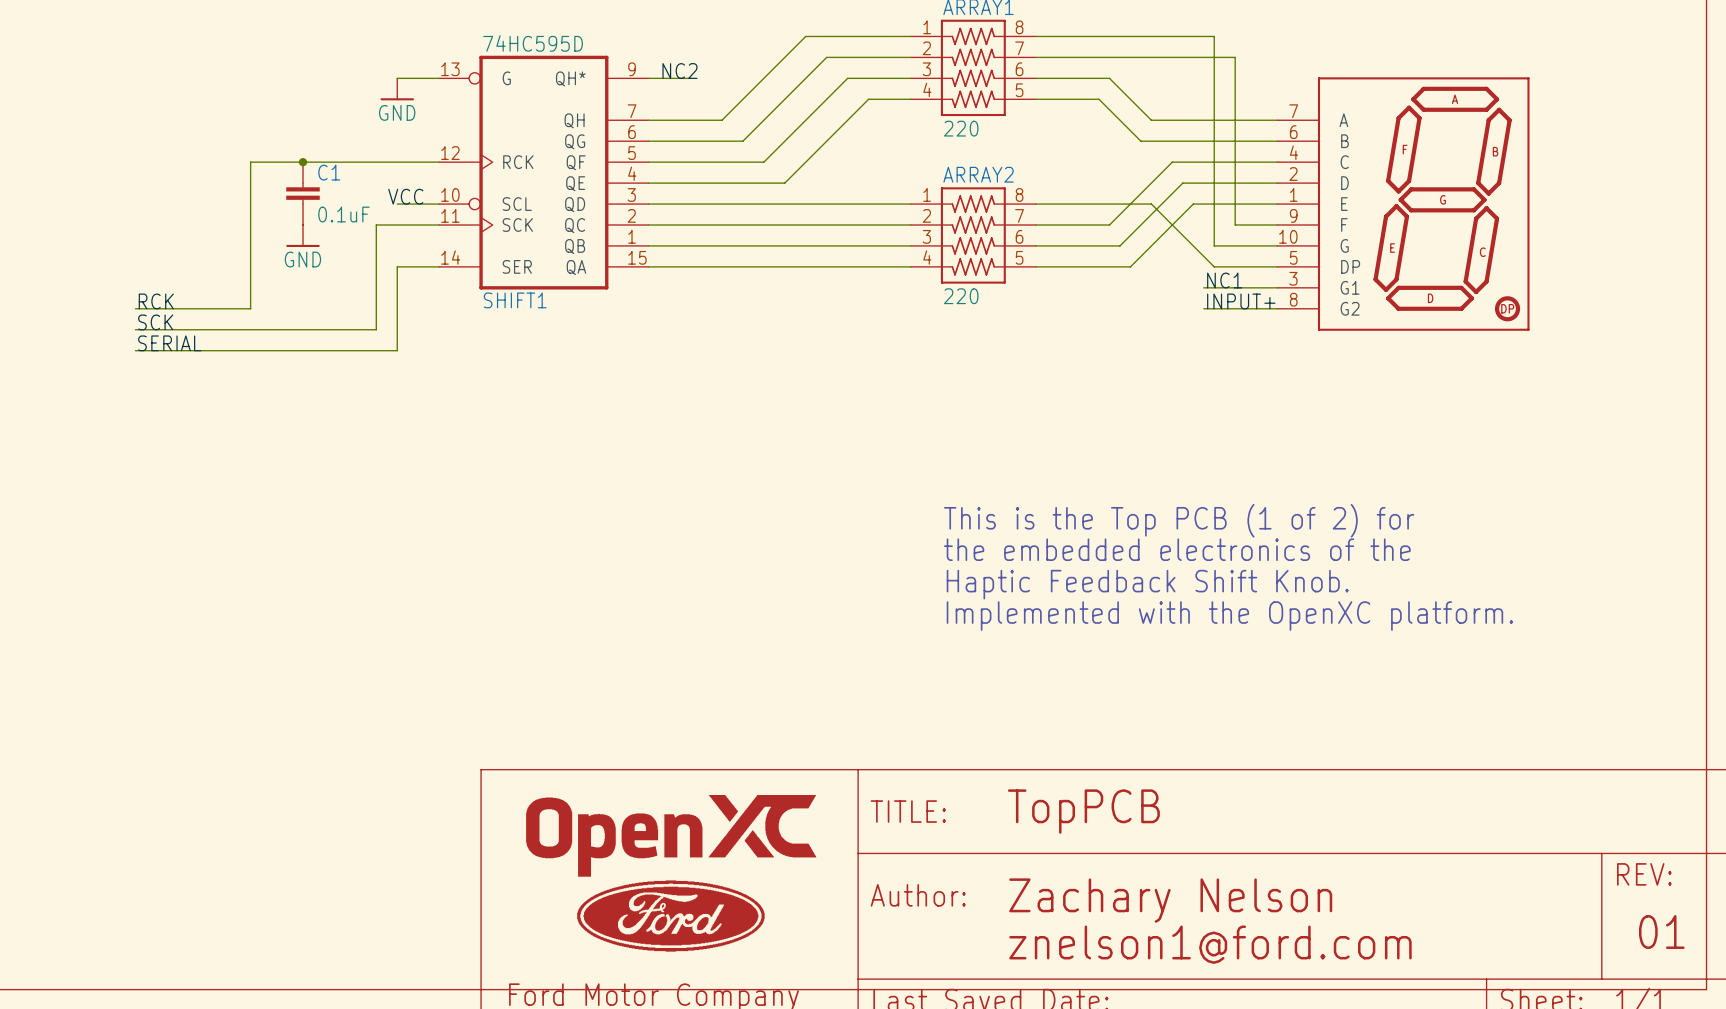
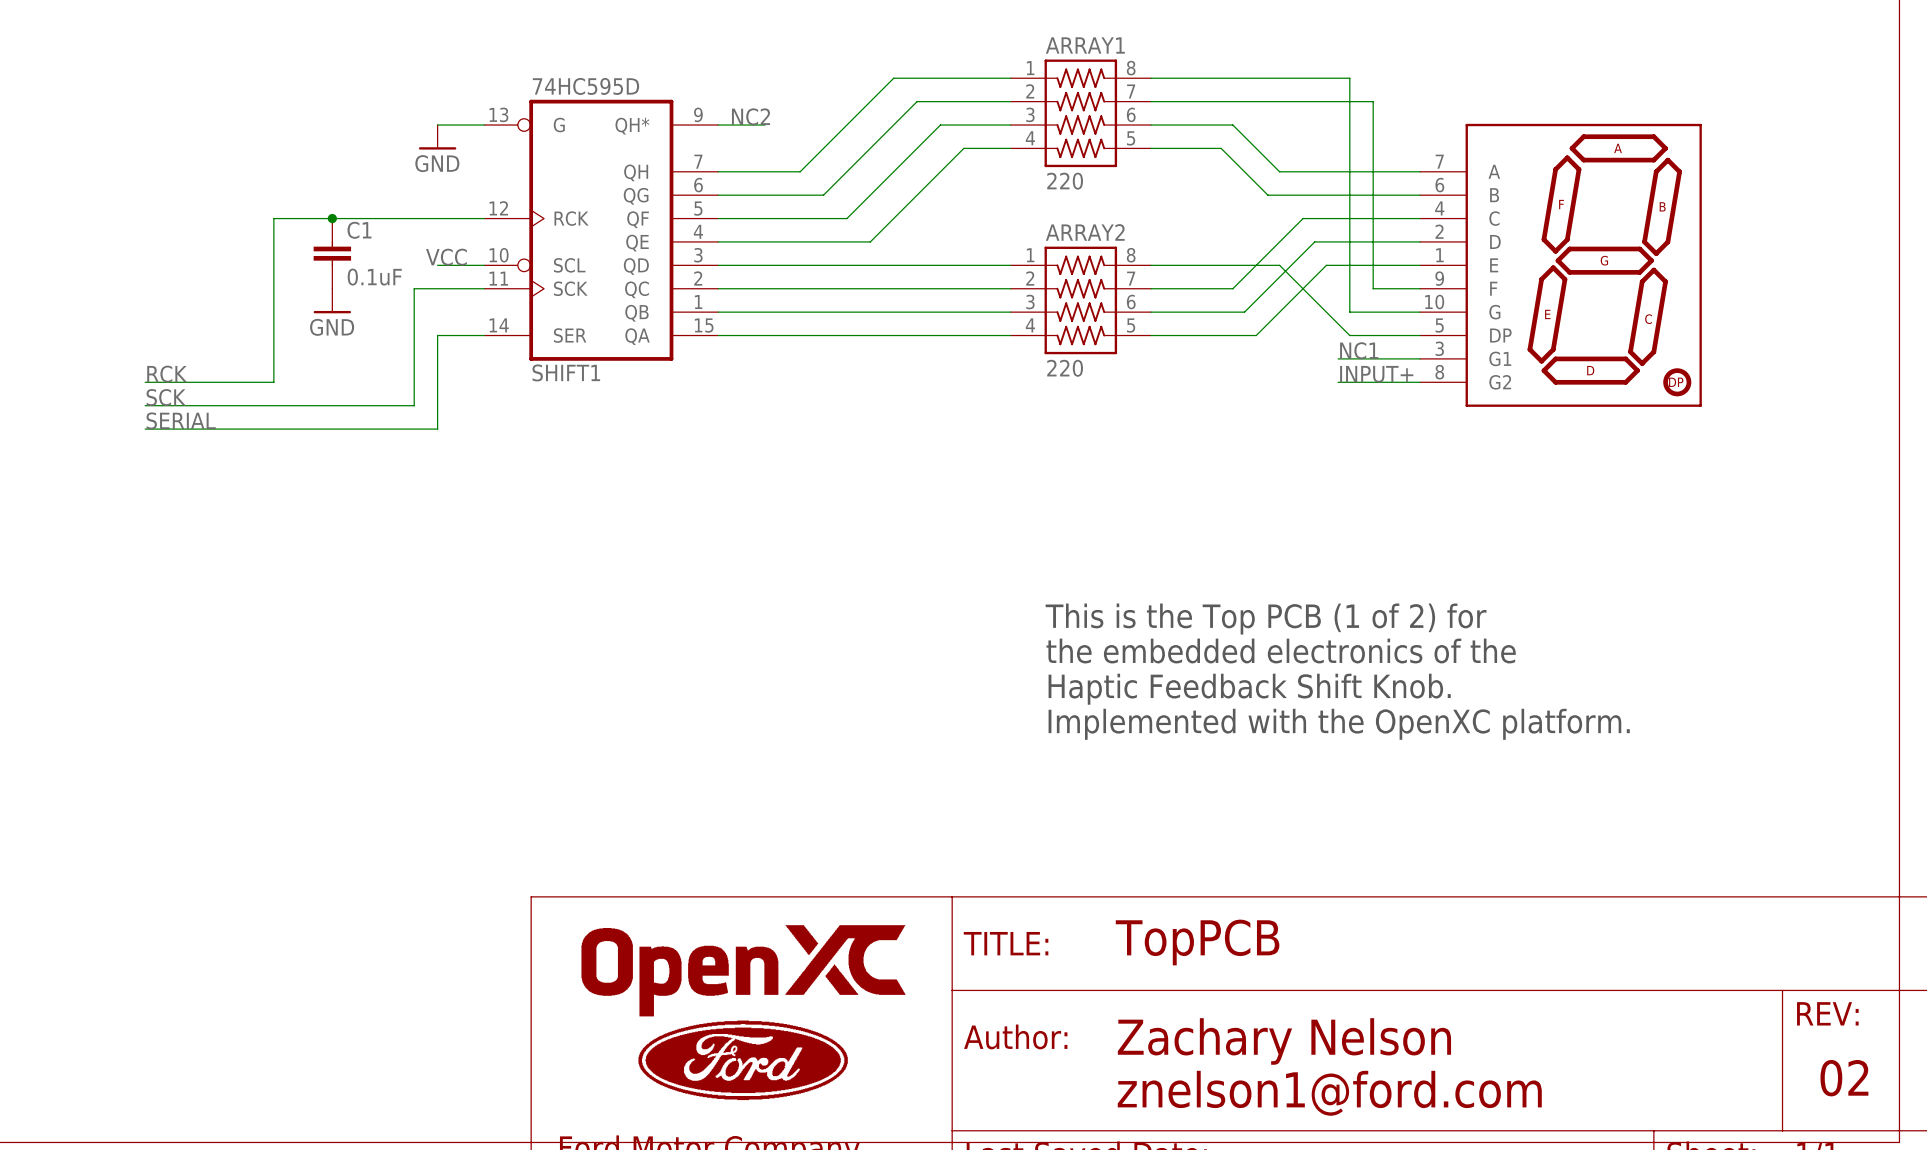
text: 01 (1661, 932) -> 02 (1844, 1078)

